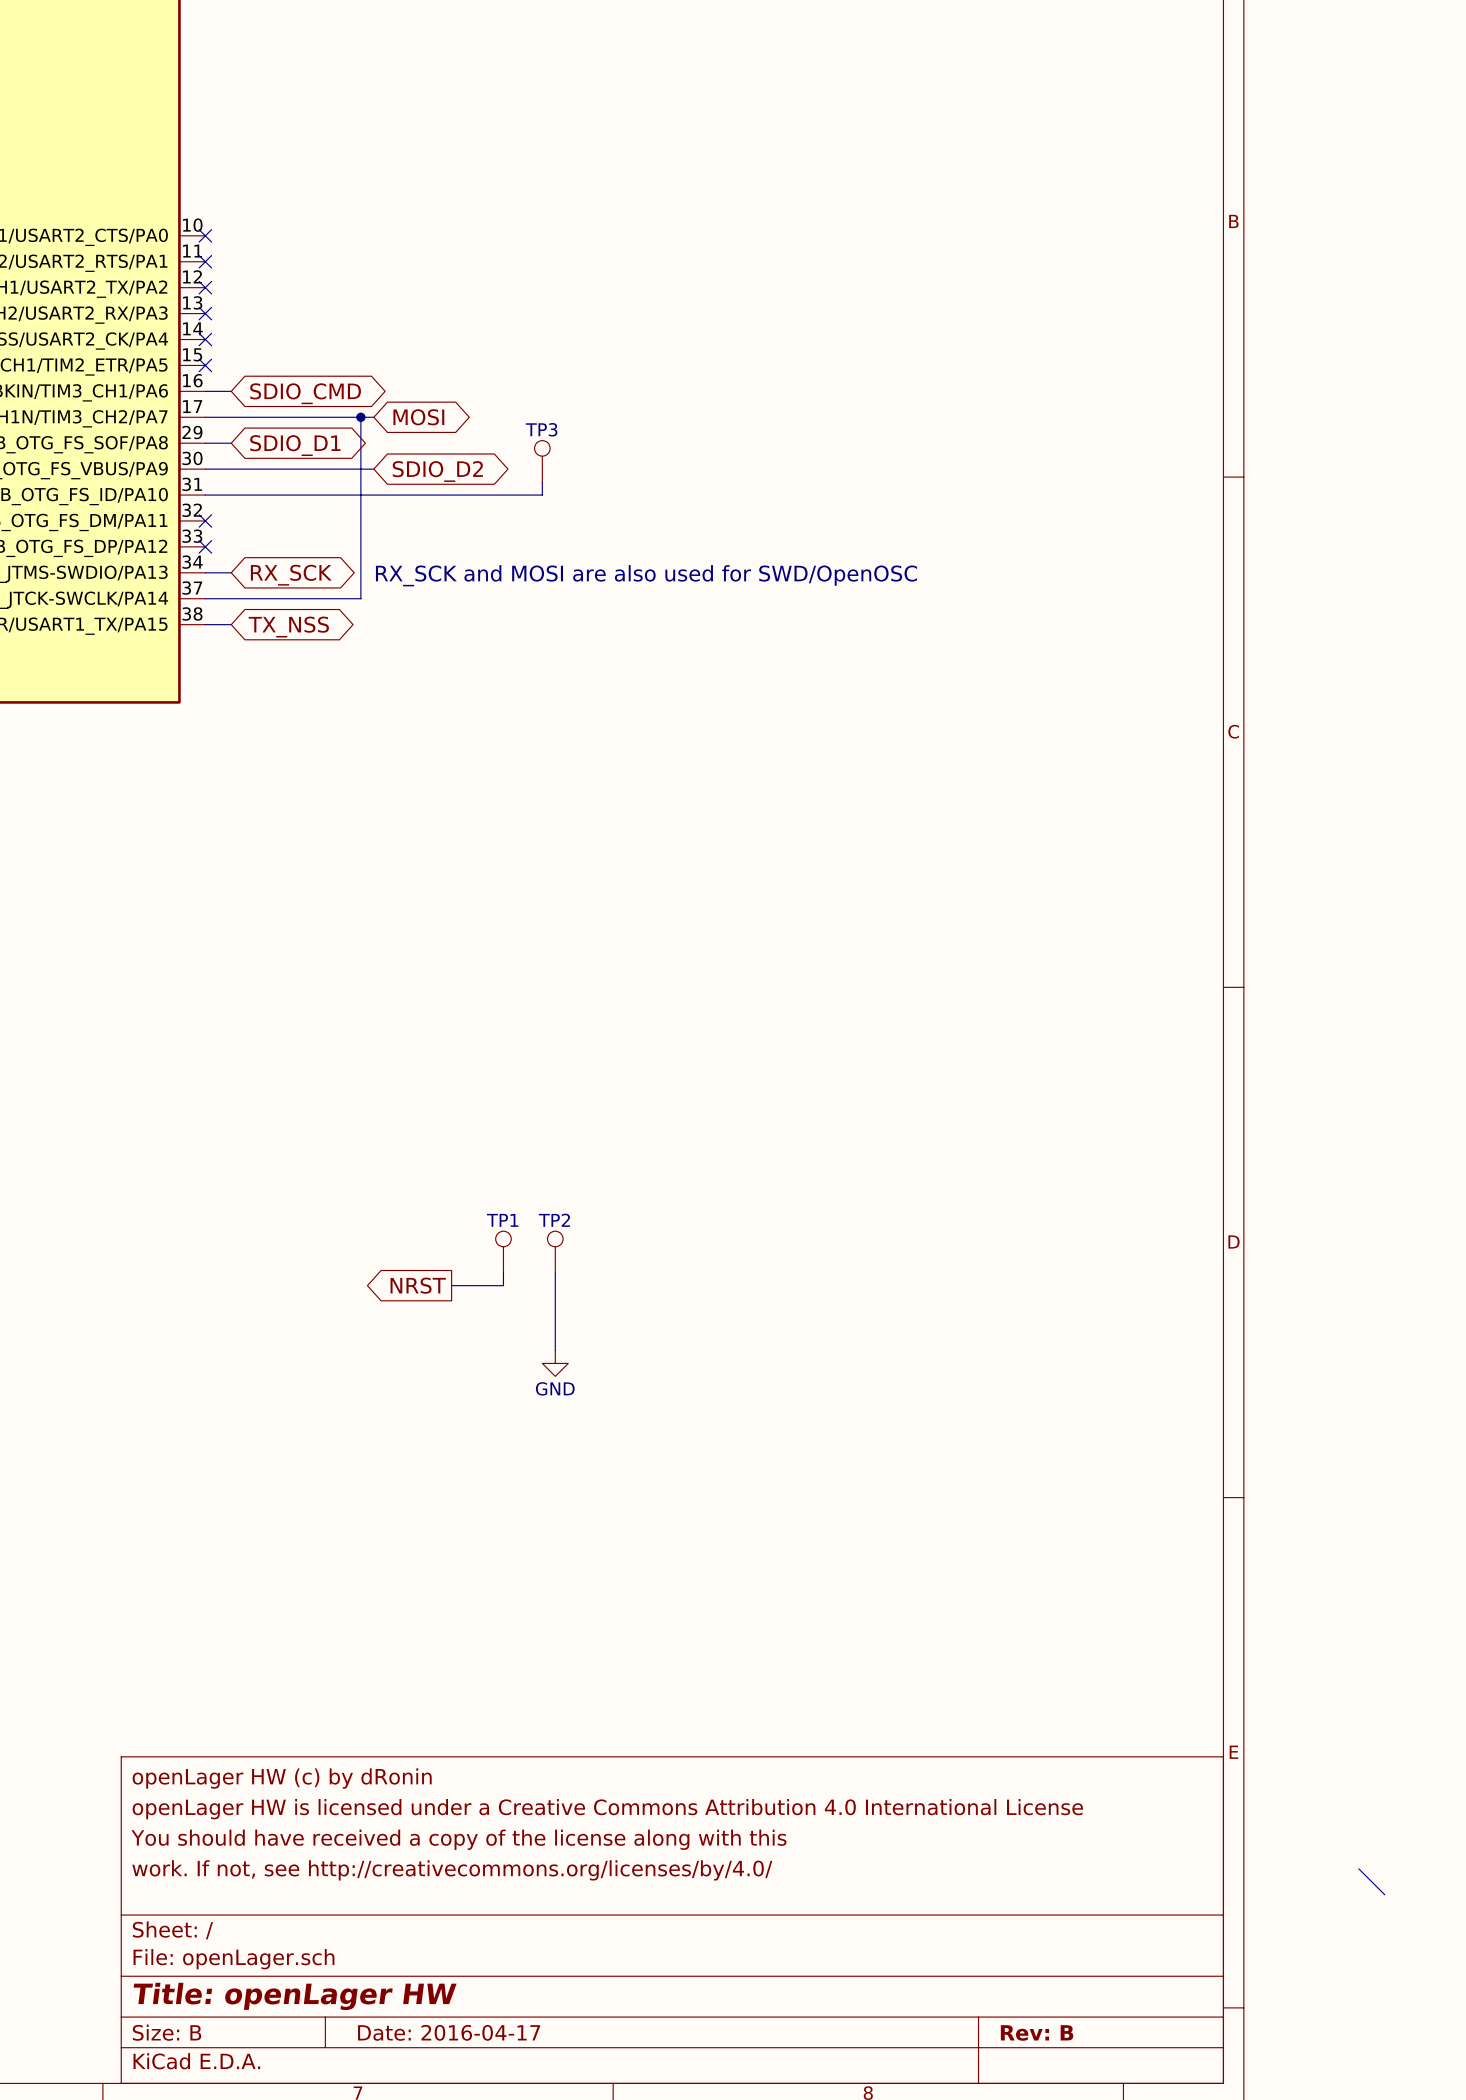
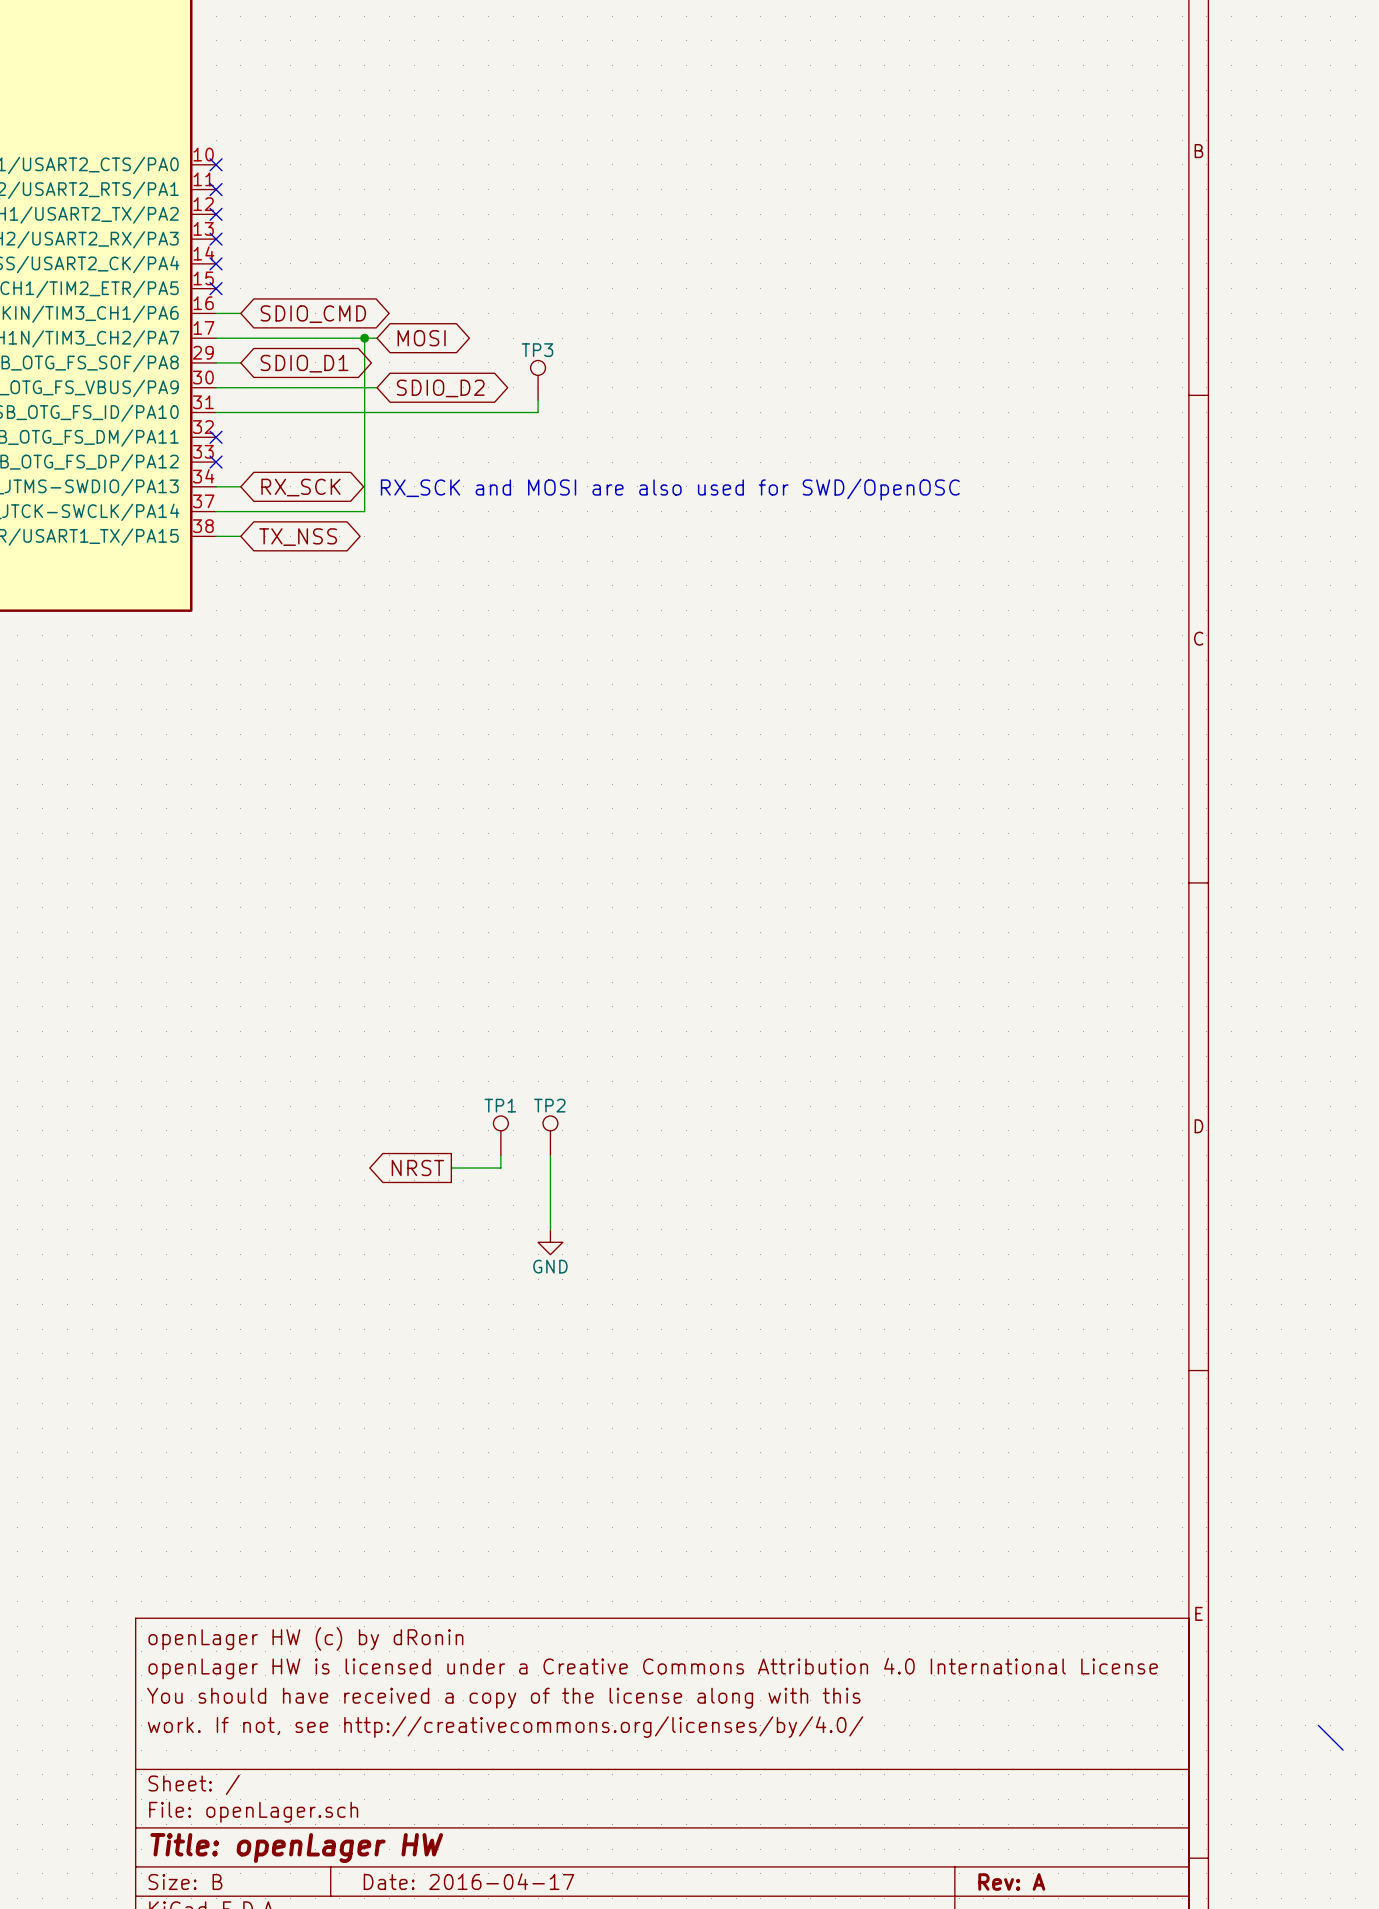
title block: Rev: B (1037, 2032) -> Rev: A (1011, 1881)

